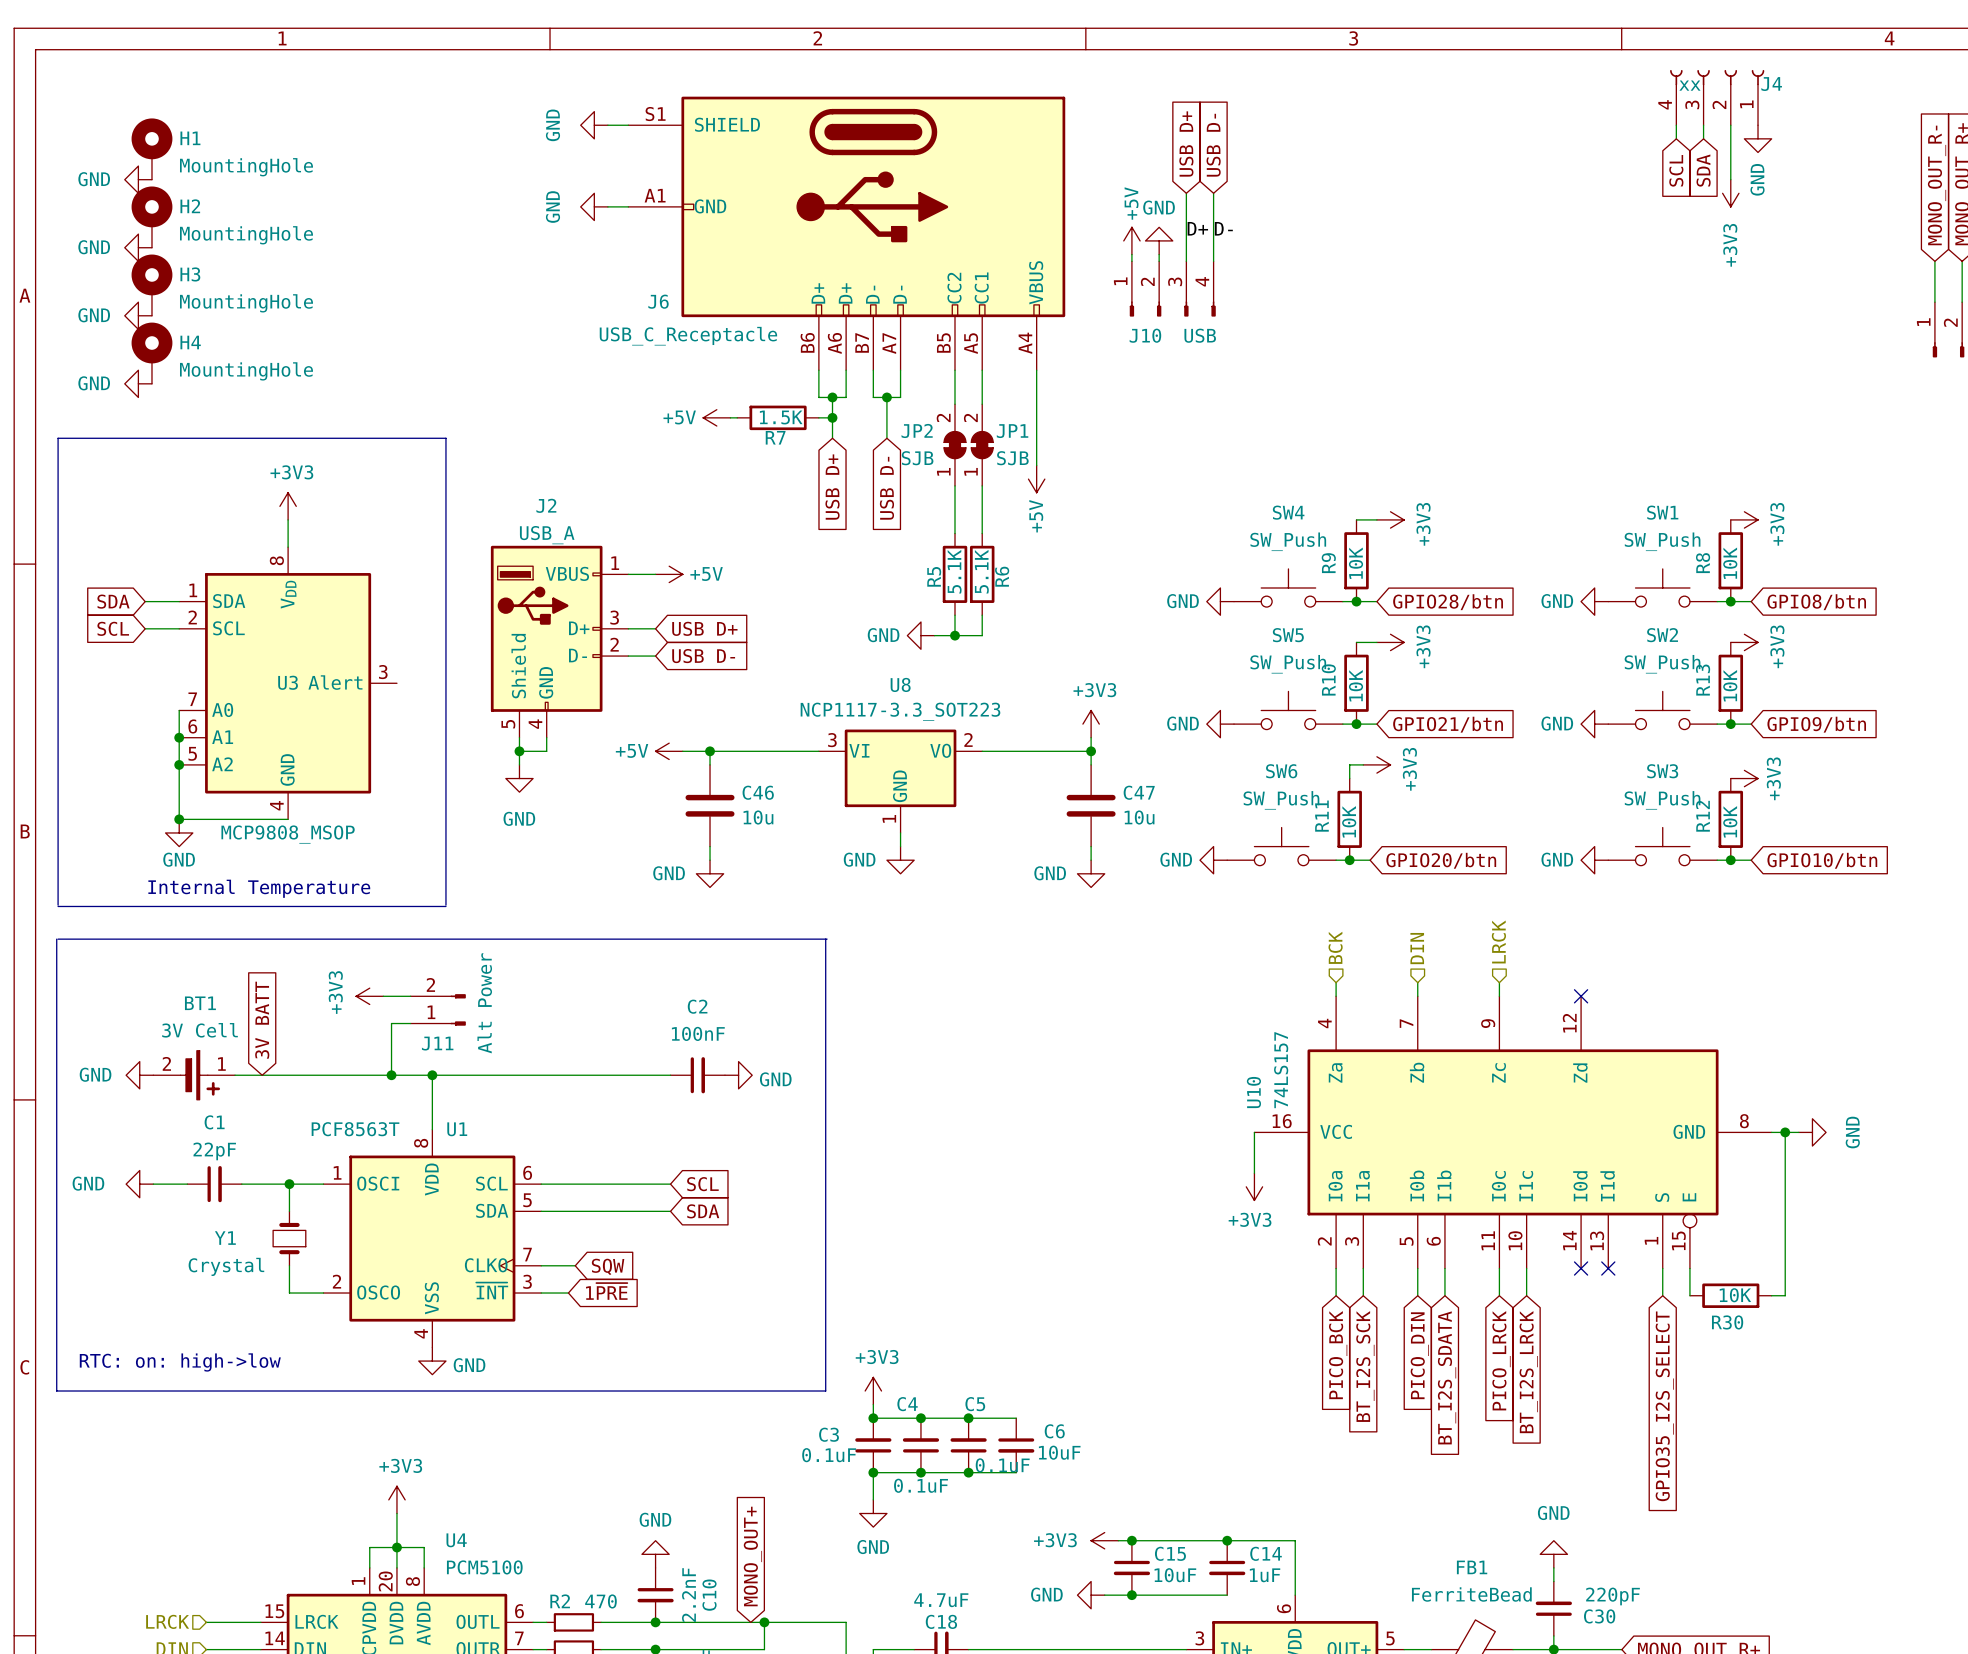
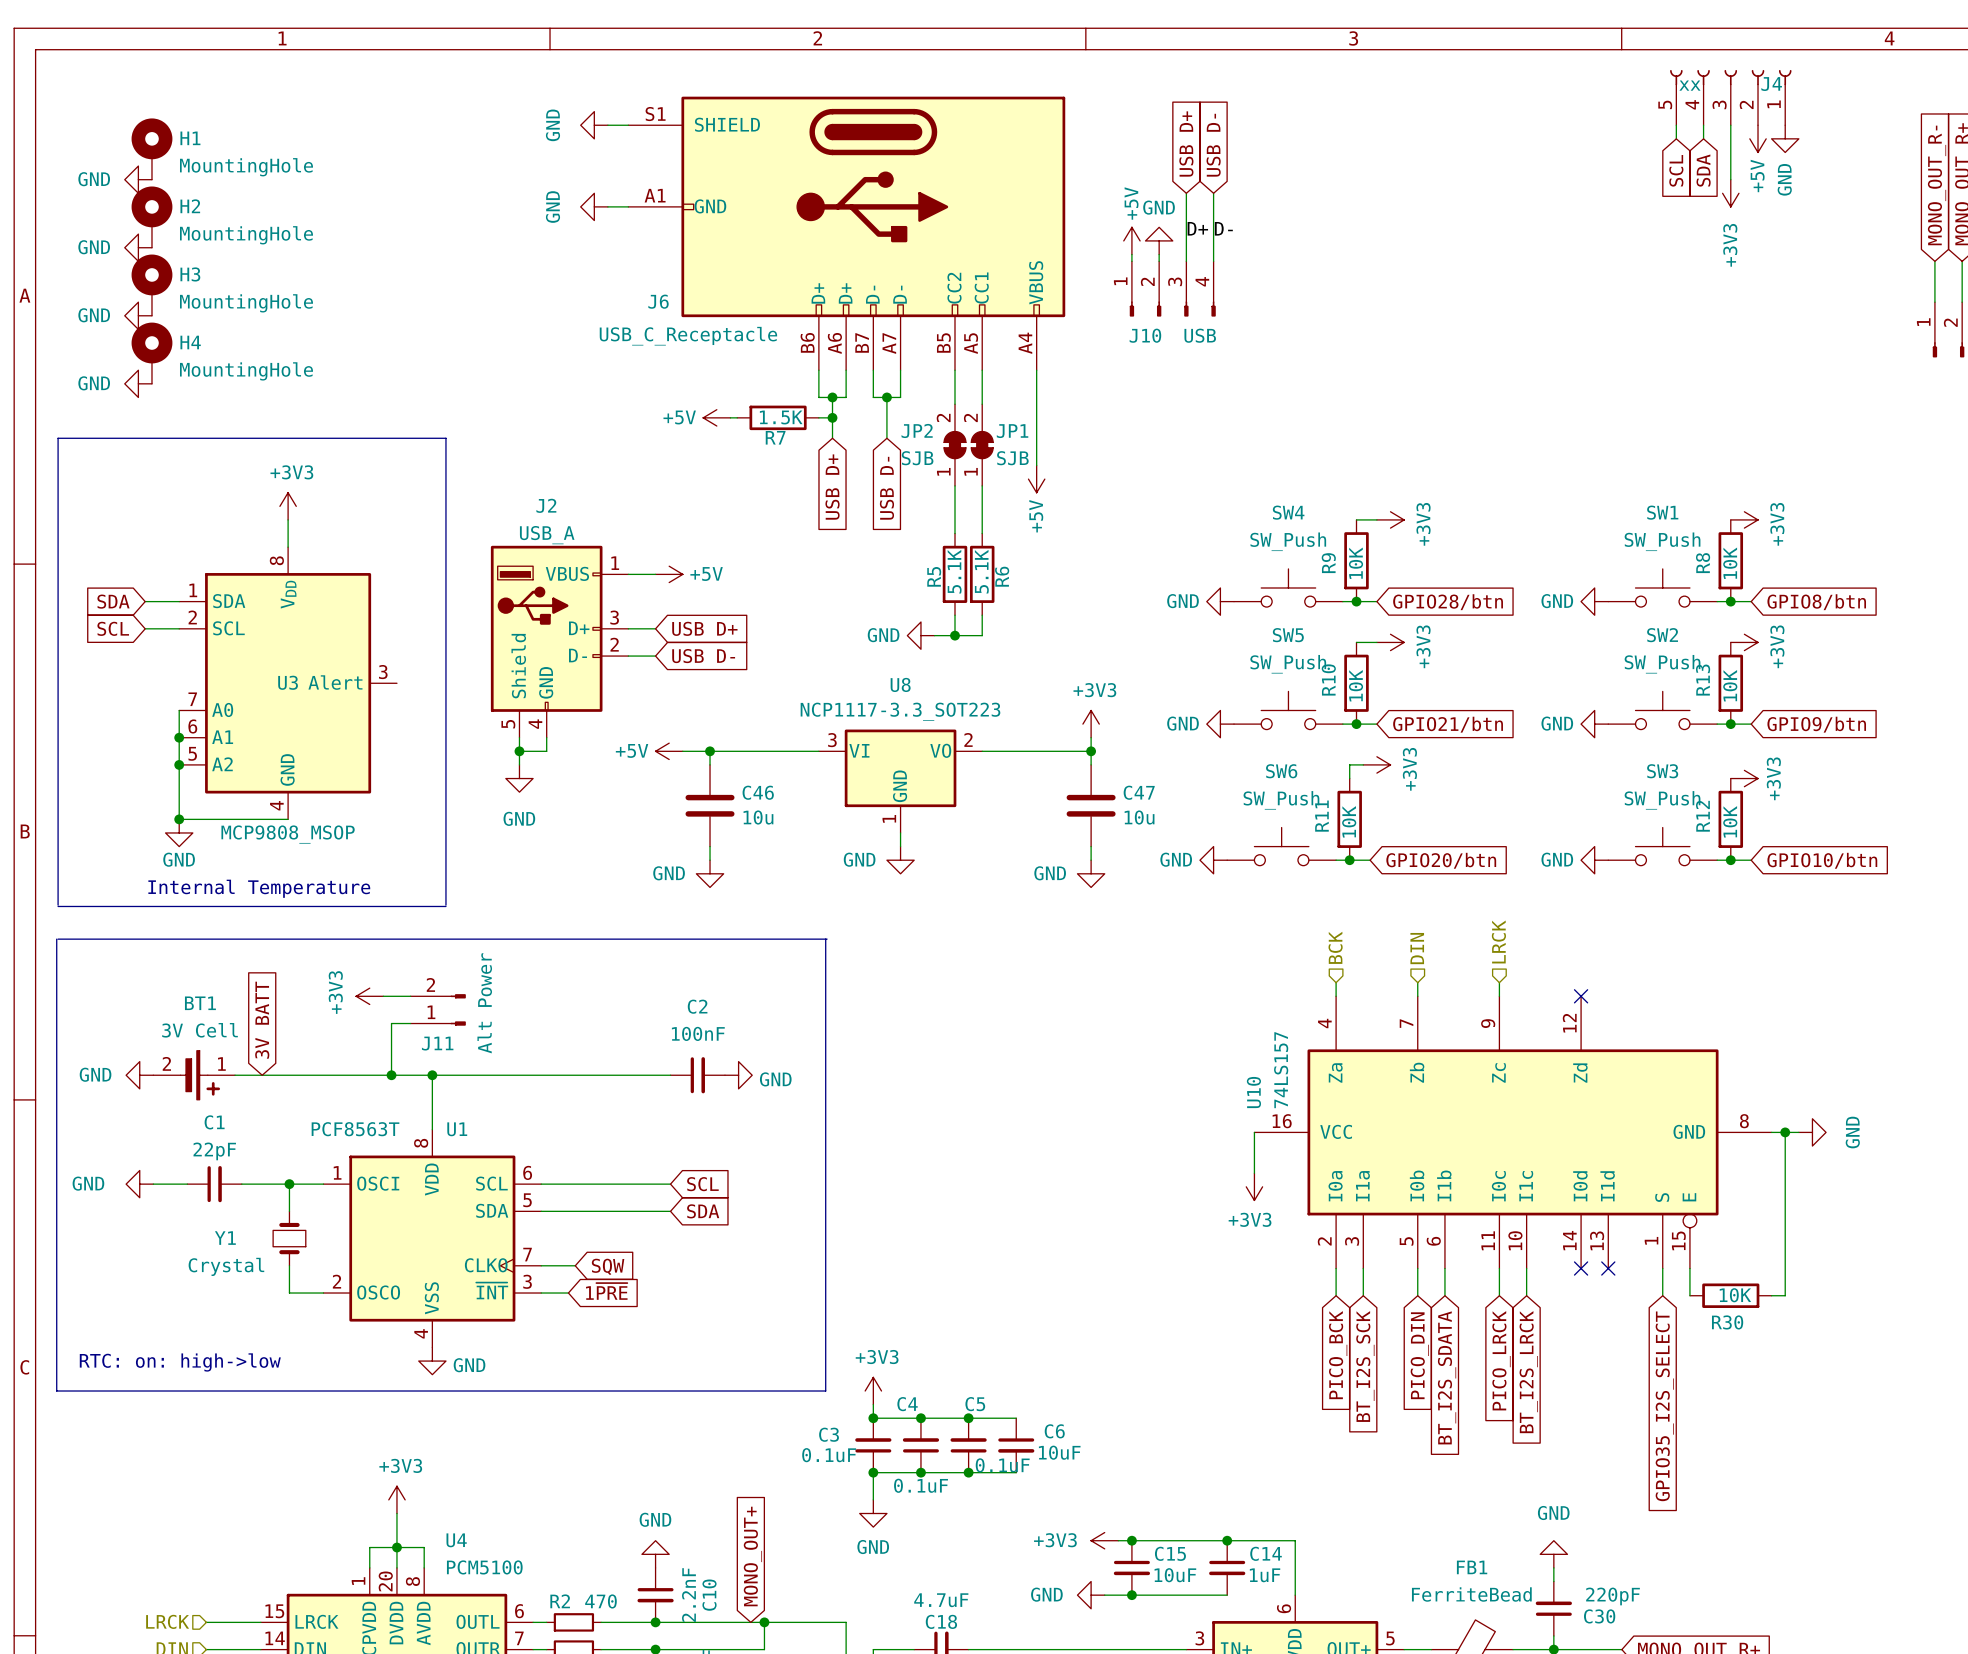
J4 symbol: [1670, 69, 1765, 126] -> [1670, 69, 1792, 126]
power symbol: GND (1758, 138) -> +5V (1758, 138)
power symbol: none -> GND (1785, 138)

